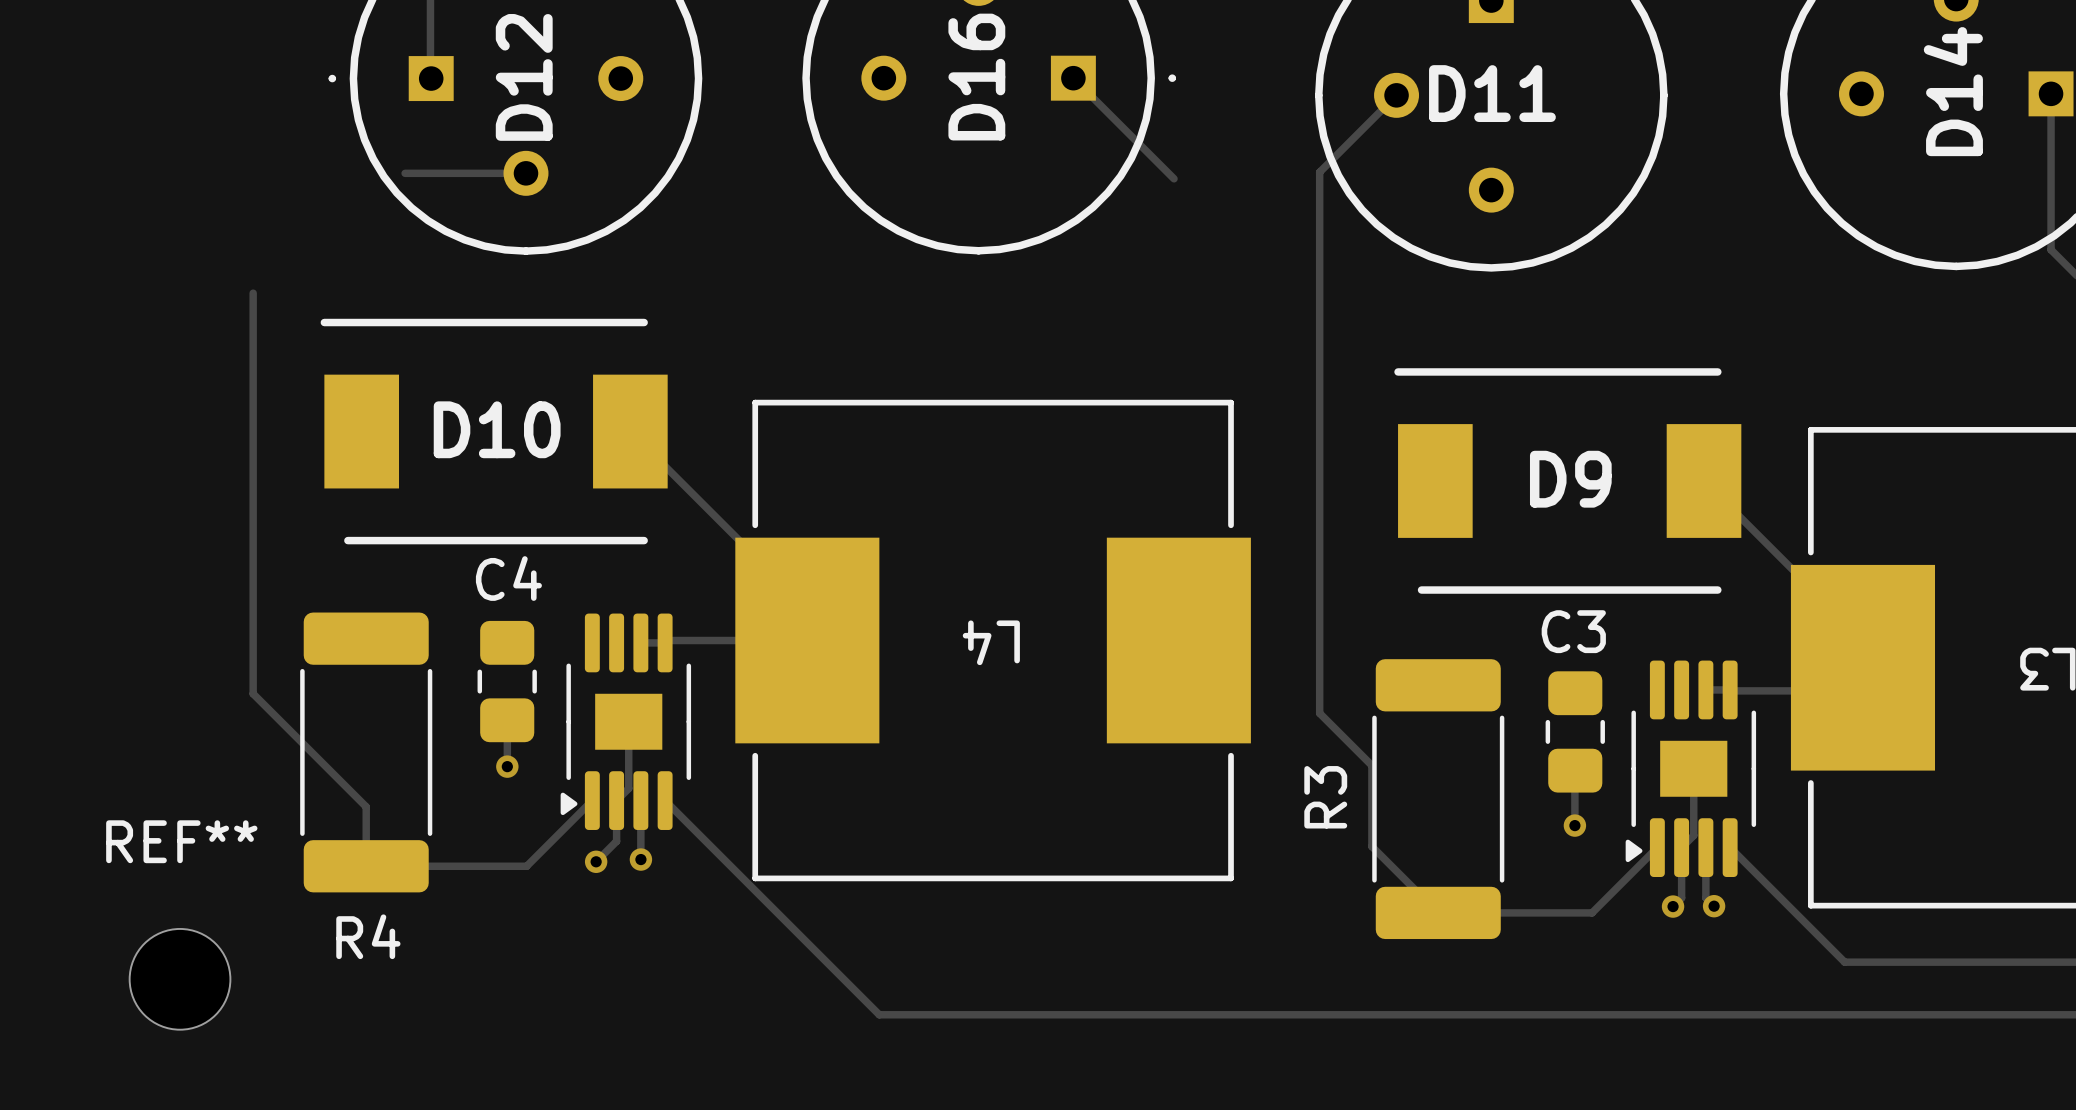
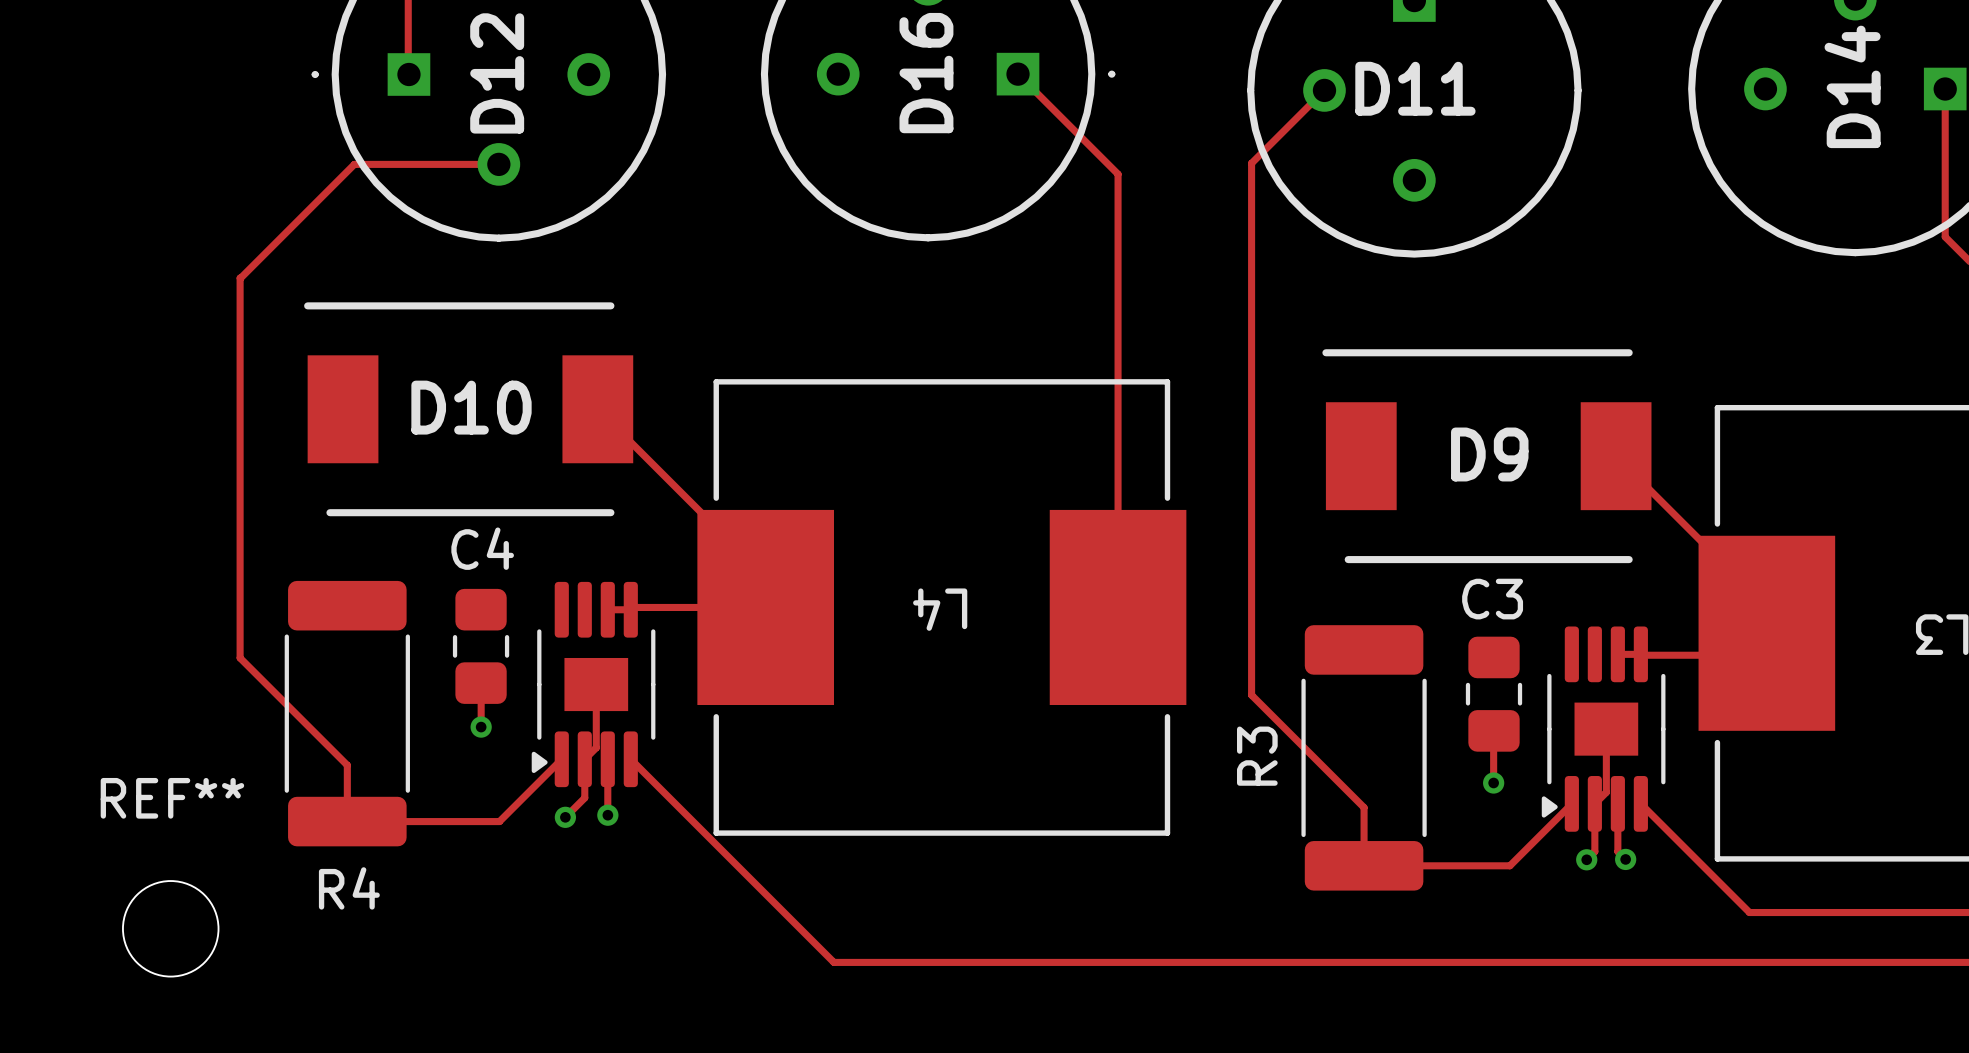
track: none -> (384, 164) (354, 164) (240, 278)
track: none -> (1113, 169) (1118, 174) (1118, 607)
track: (1319, 713) (1371, 765) (1371, 846) (1438, 912) -> (1251, 676) (1251, 695) (1364, 807) (1364, 865)

